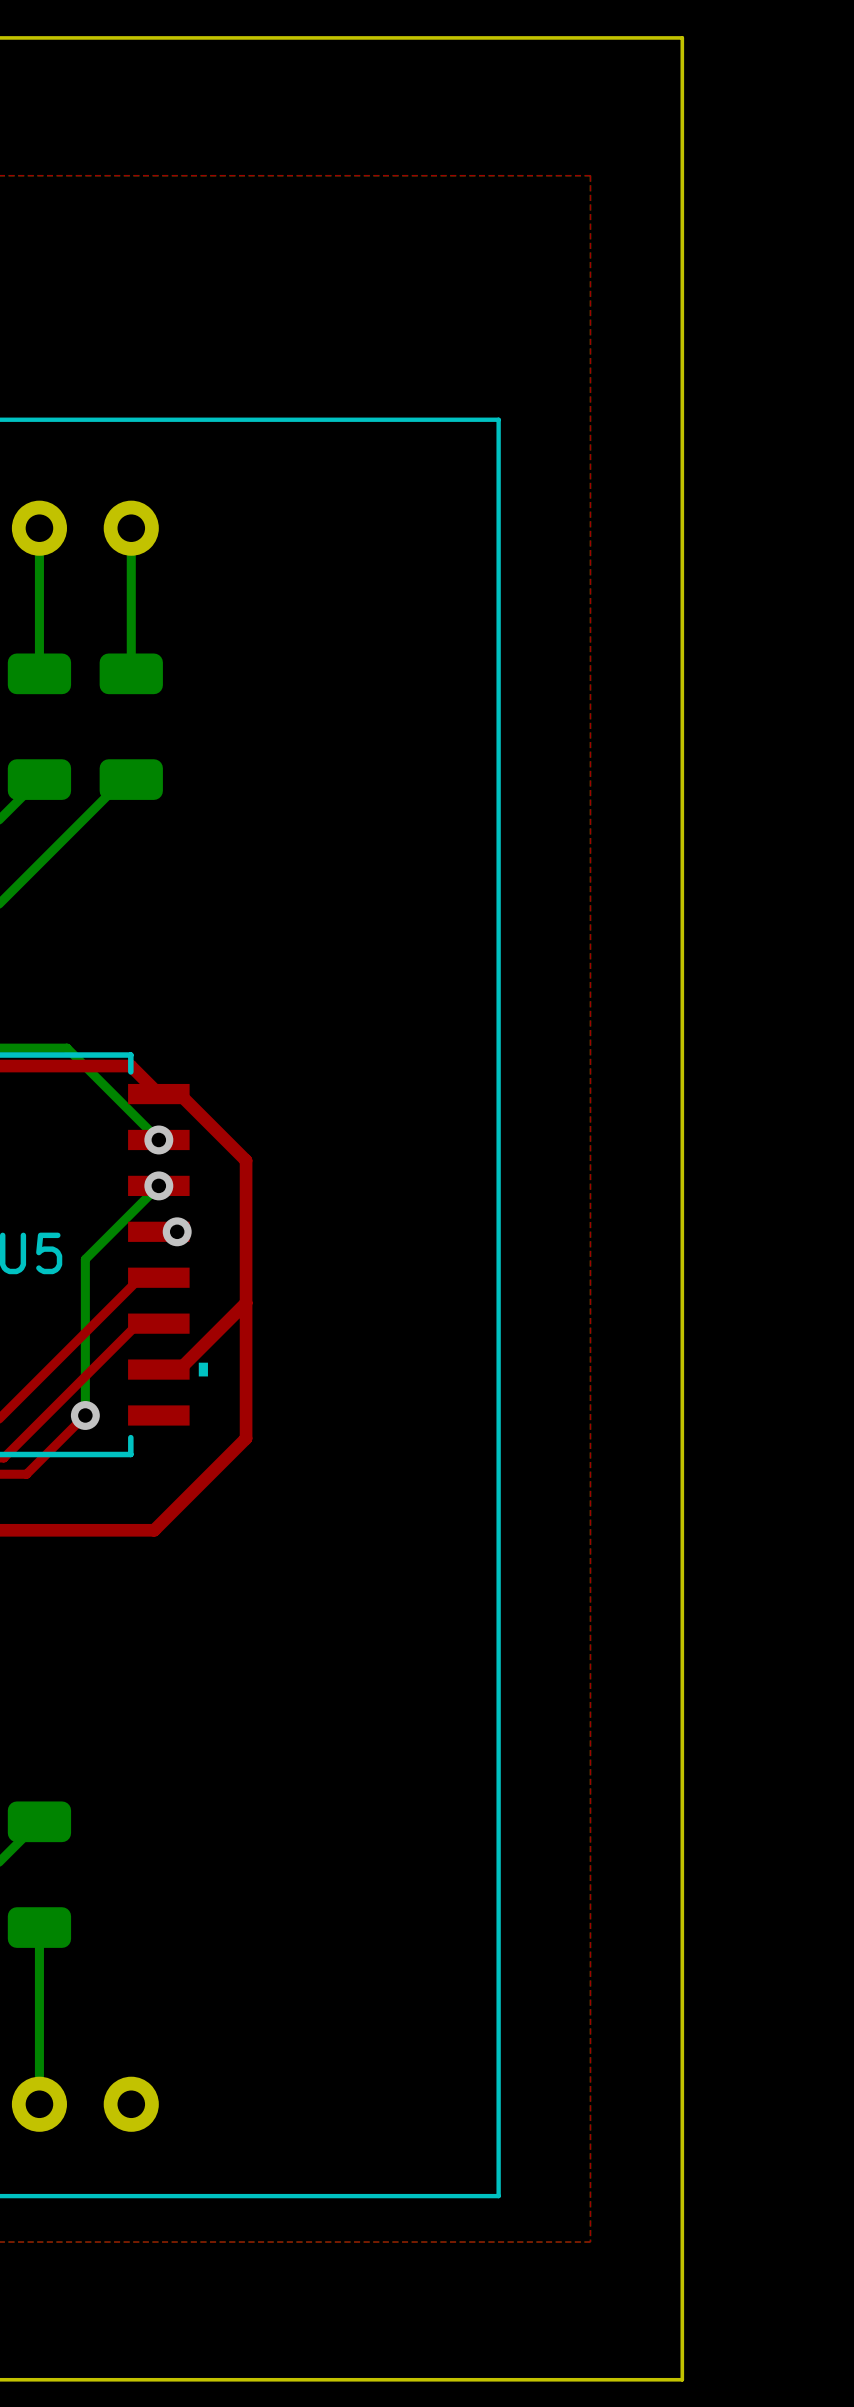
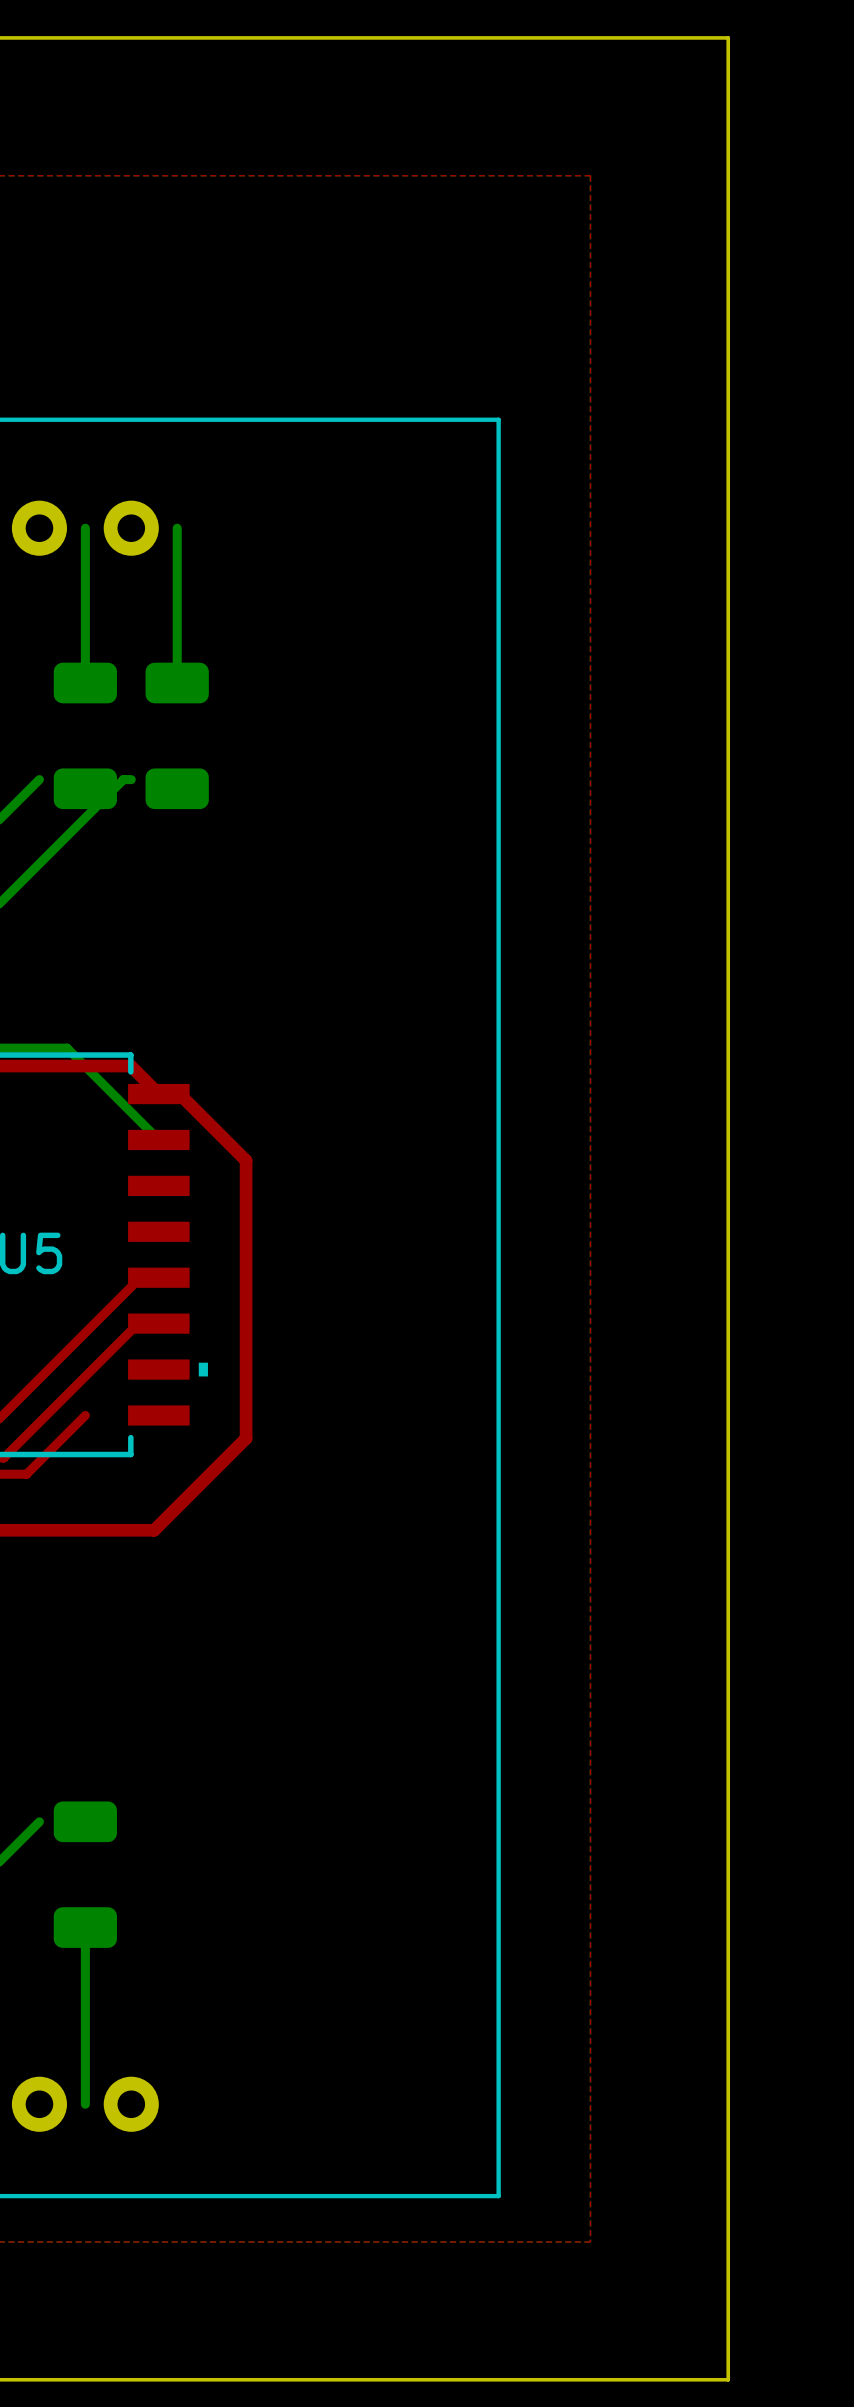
board edge: (682, 37) (682, 2379) -> (682, 37) (728, 37) (728, 2379) (682, 2379)
bottom track: (39, 528) (39, 673) -> none
bottom track: none -> (85, 528) (85, 683)
bottom track: (131, 528) (131, 673) -> none
bottom track: none -> (177, 528) (177, 683)
part: (39, 726) -> none
part: (131, 726) -> none
part: none -> (85, 735)
part: none -> (177, 735)
via: (158, 1139) -> none
bottom track: (158, 1185) (85, 1259) (85, 1415) -> none
via: (158, 1185) -> none
via: (177, 1231) -> none
top track: (246, 1302) (179, 1369) (158, 1369) -> none
via: (85, 1415) -> none
part position: (39, 1874) -> (85, 1874)
bottom track: (39, 1927) (39, 2104) -> (85, 1927) (85, 2104)

